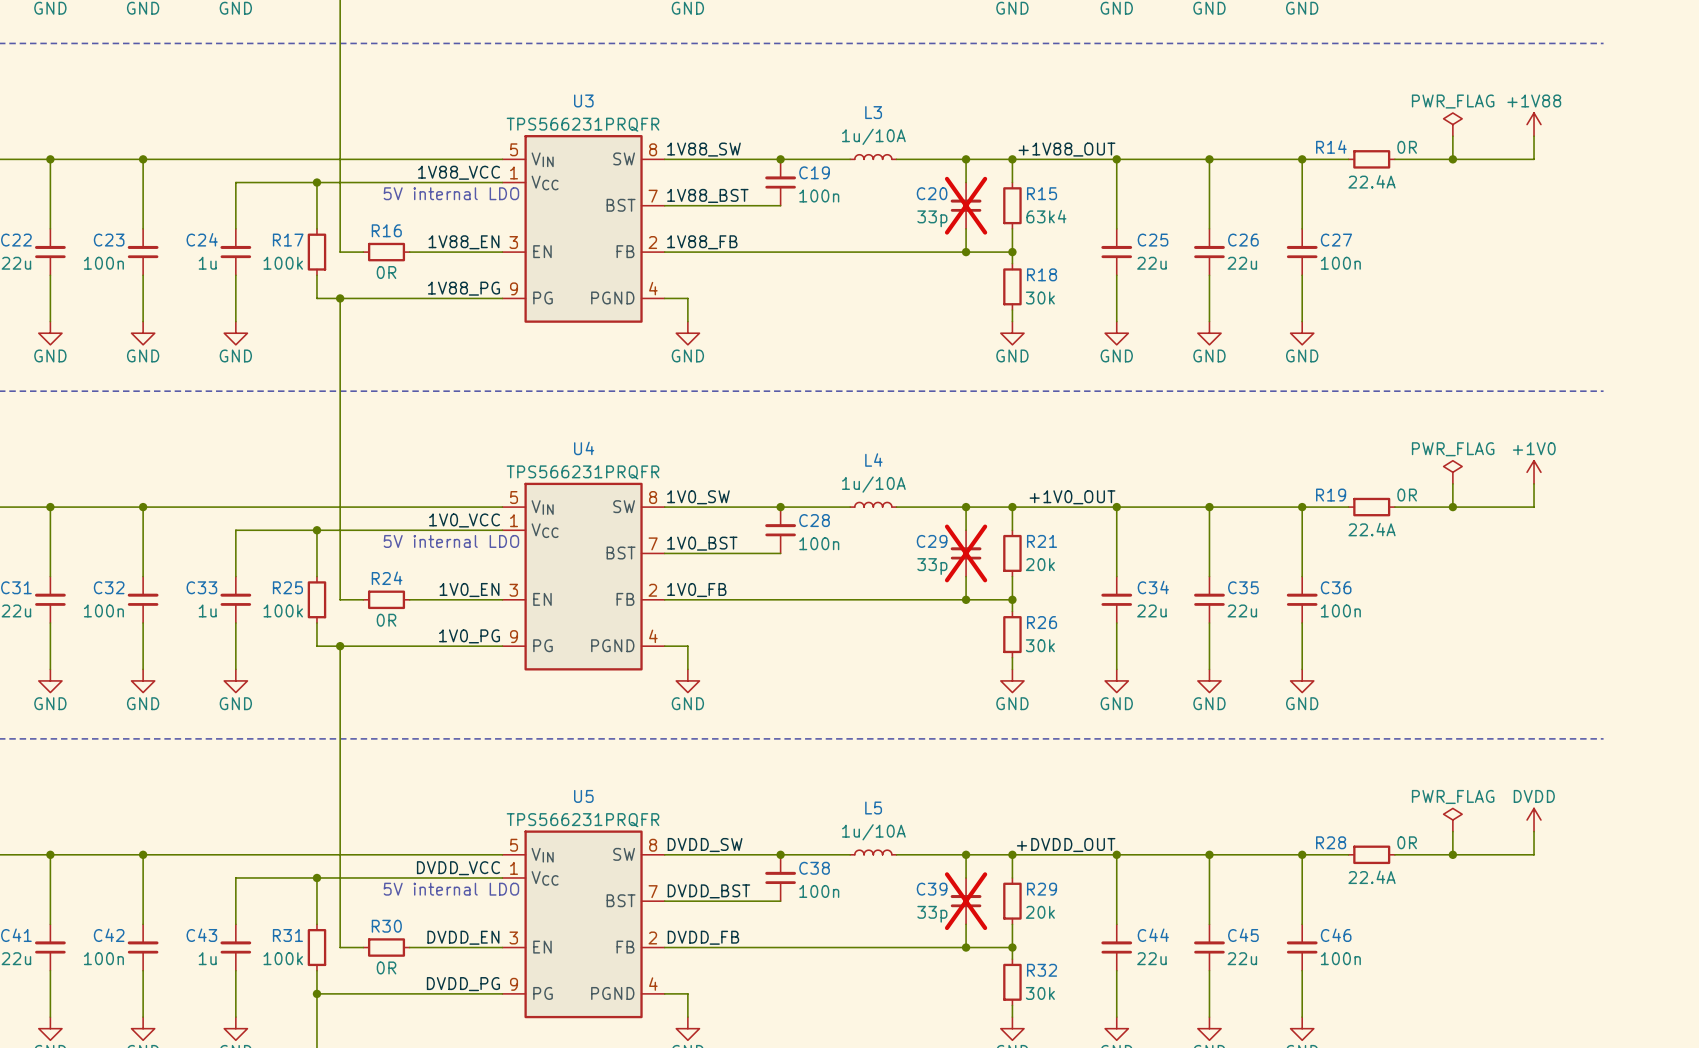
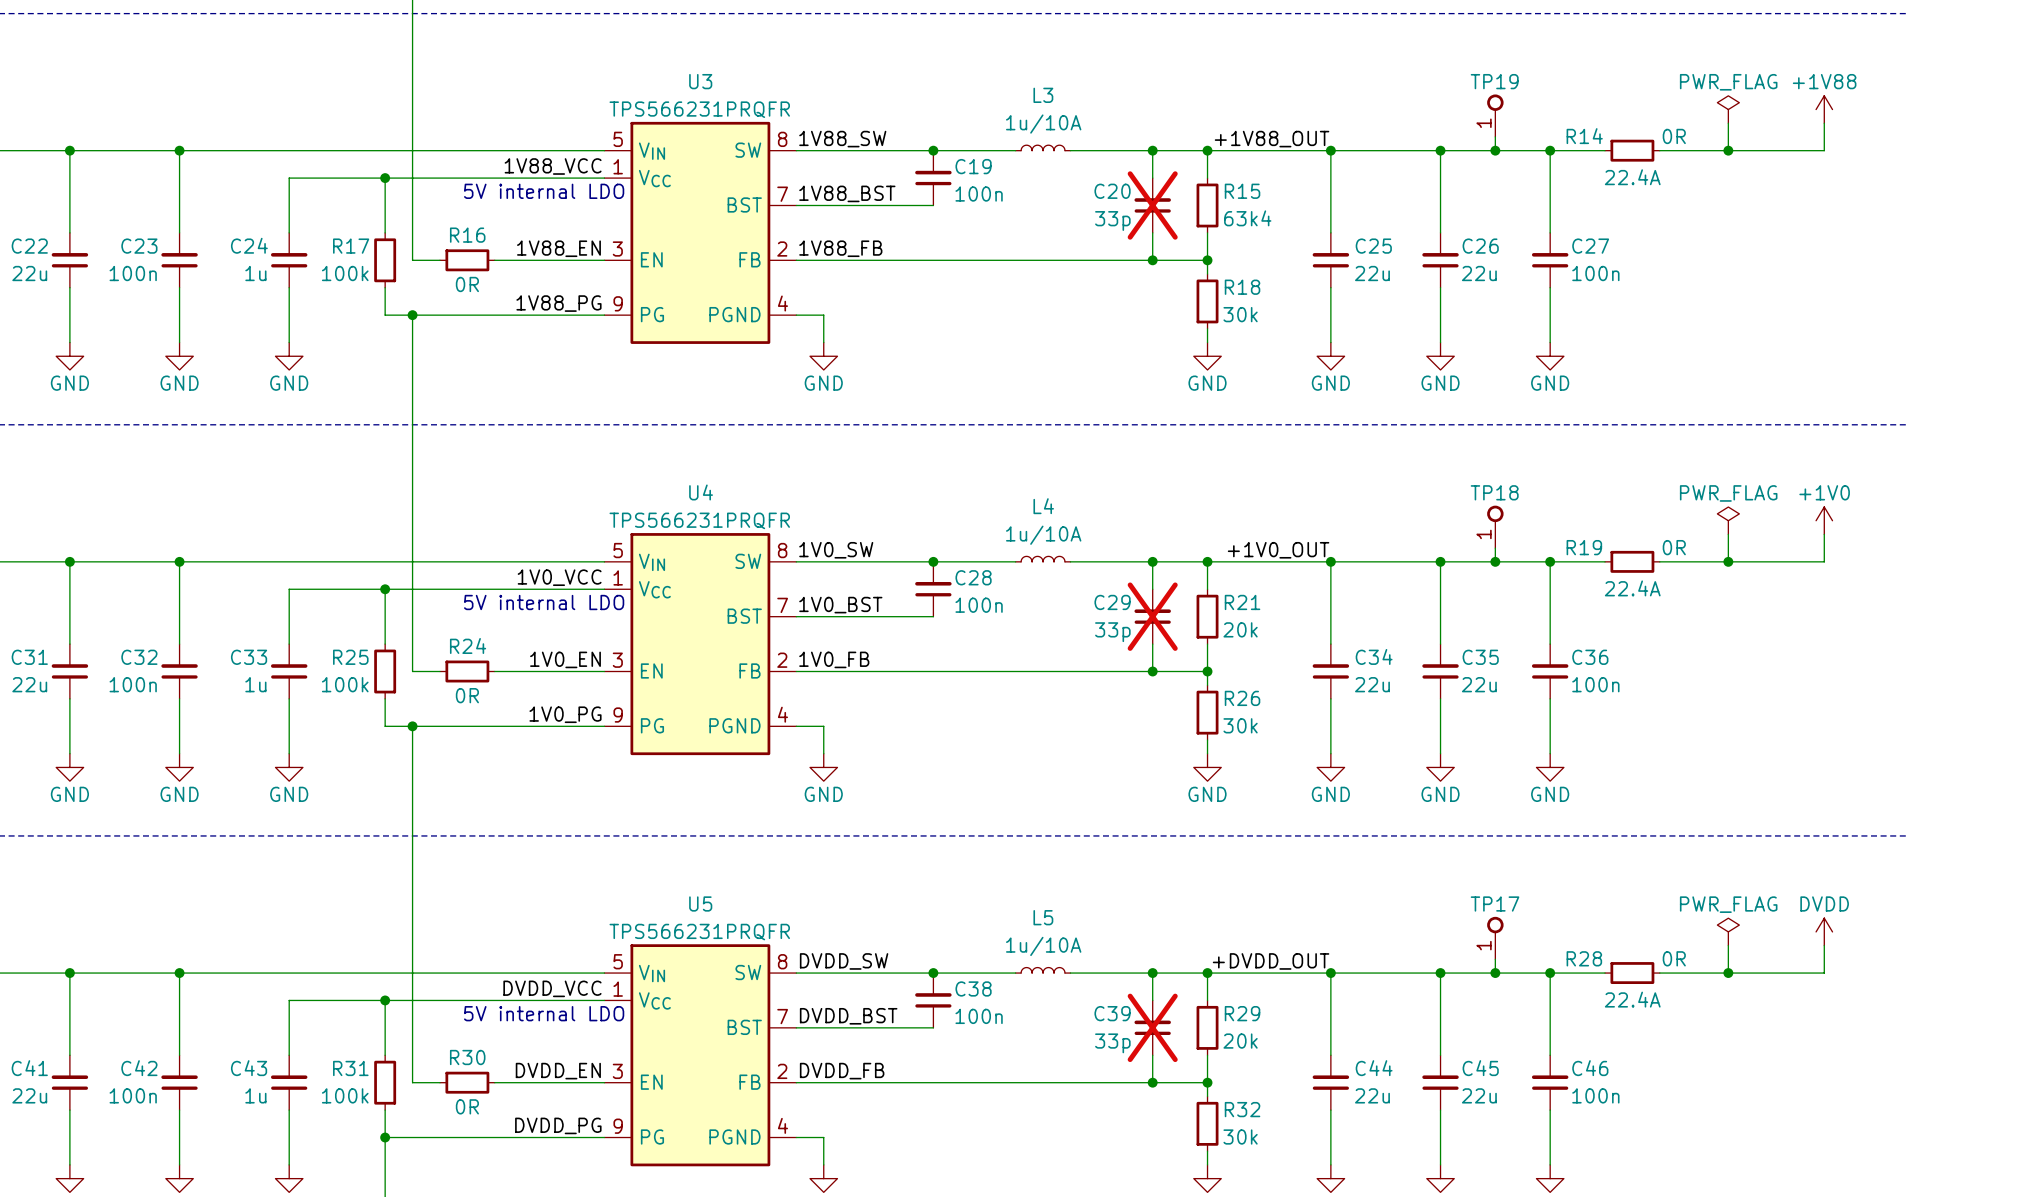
TP19: none -> (1495, 115)
wire: none -> (1495, 136) (1495, 150)
junction: none -> (1495, 150)
TP18: none -> (1495, 526)
wire: none -> (1495, 548) (1495, 561)
junction: none -> (1495, 561)
TP17: none -> (1495, 938)
wire: none -> (1495, 959) (1495, 973)
junction: none -> (1495, 973)

